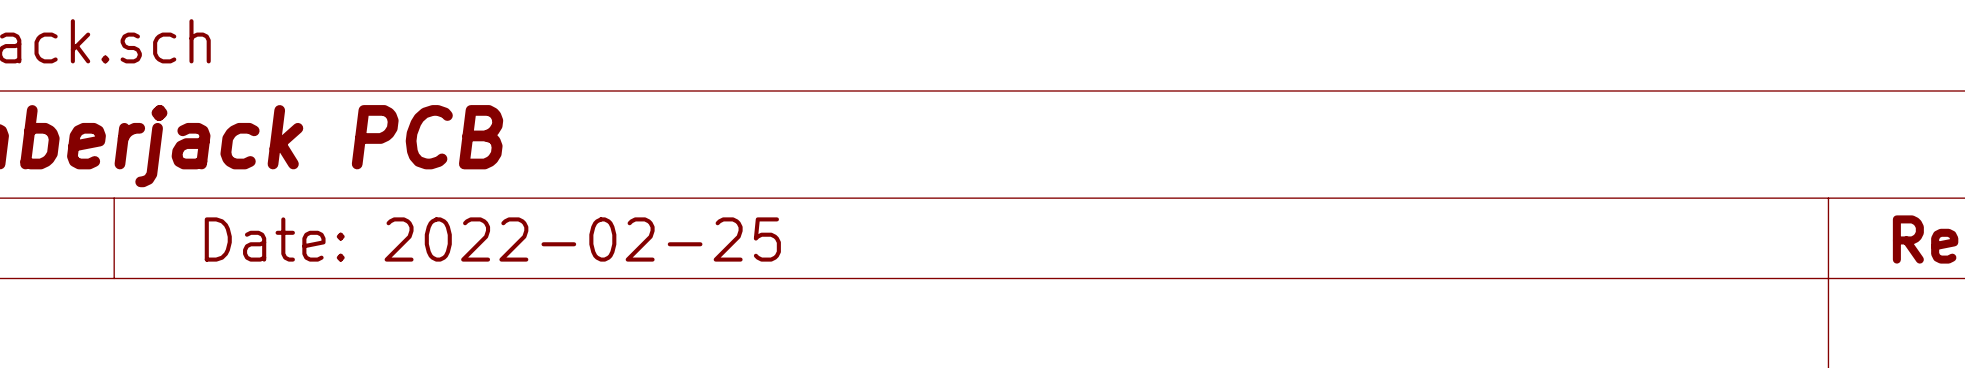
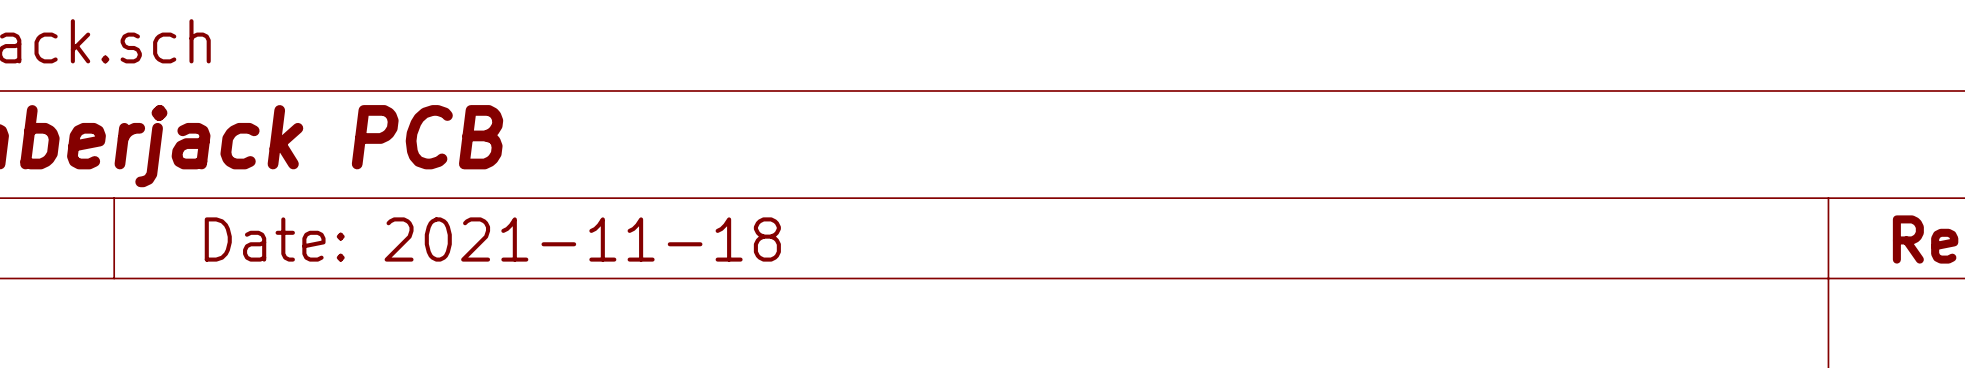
title block: Date: 2022-02-25 (492, 239) -> Date: 2021-11-18 (492, 239)

